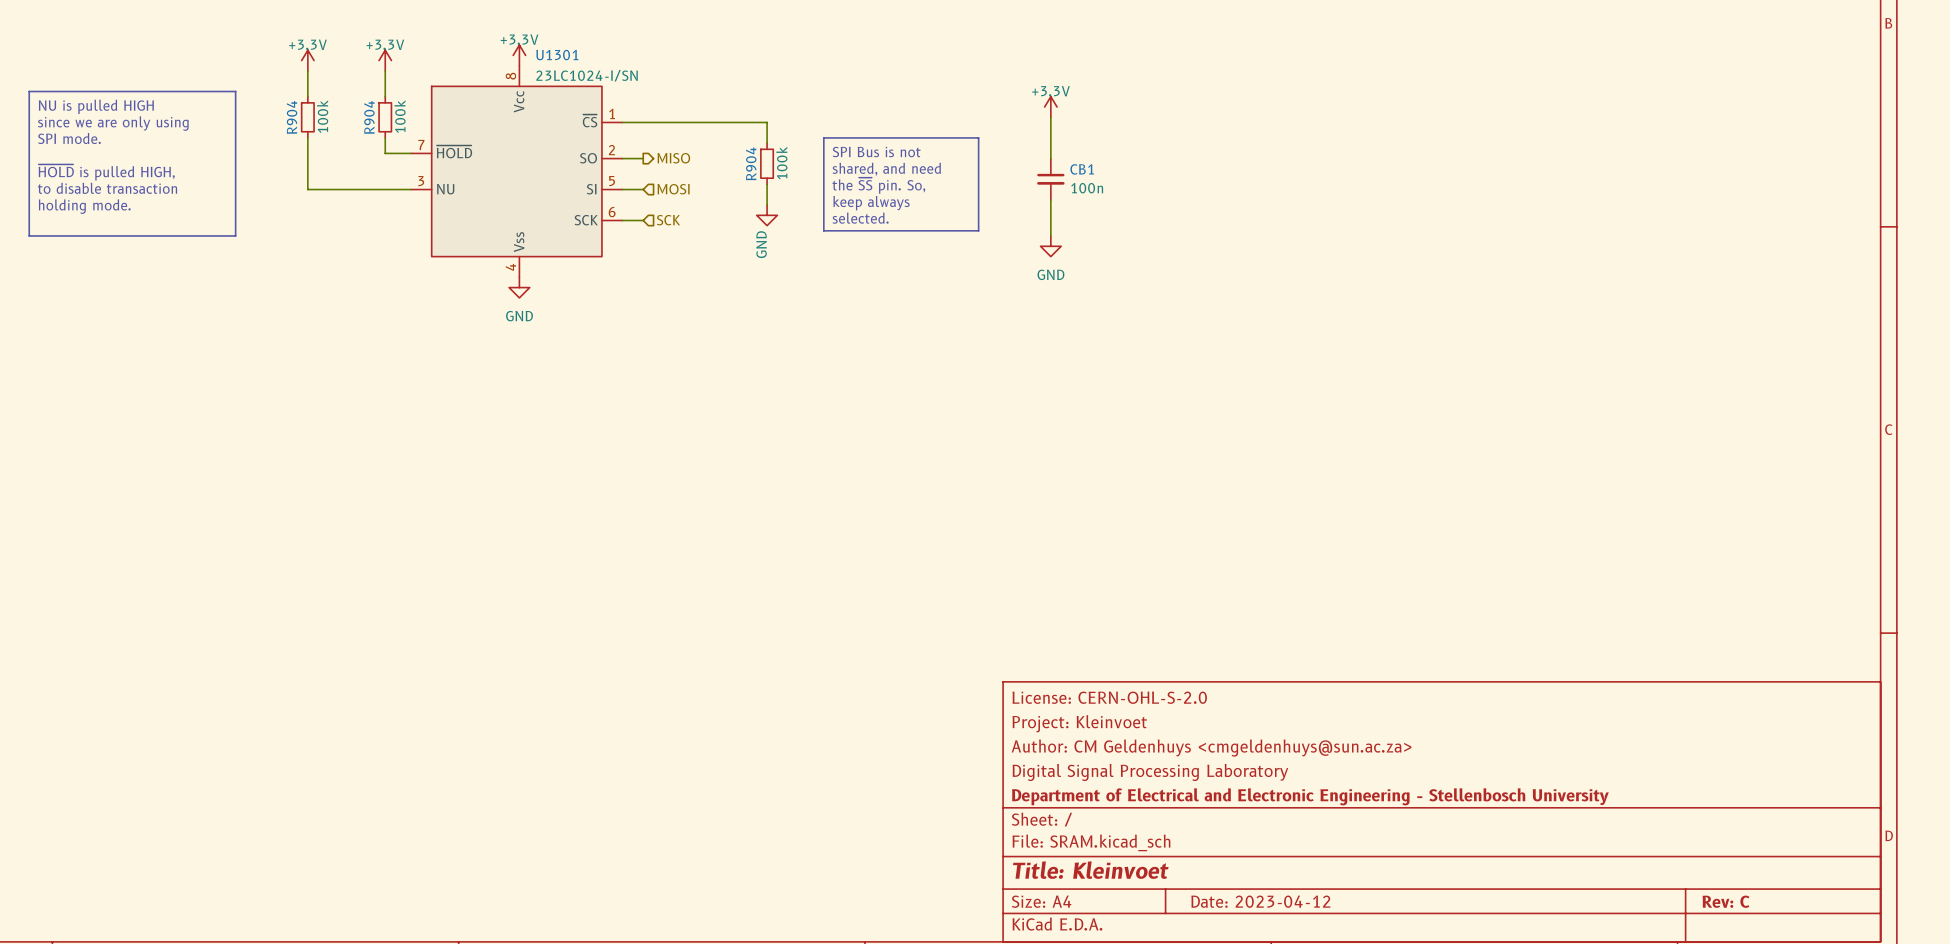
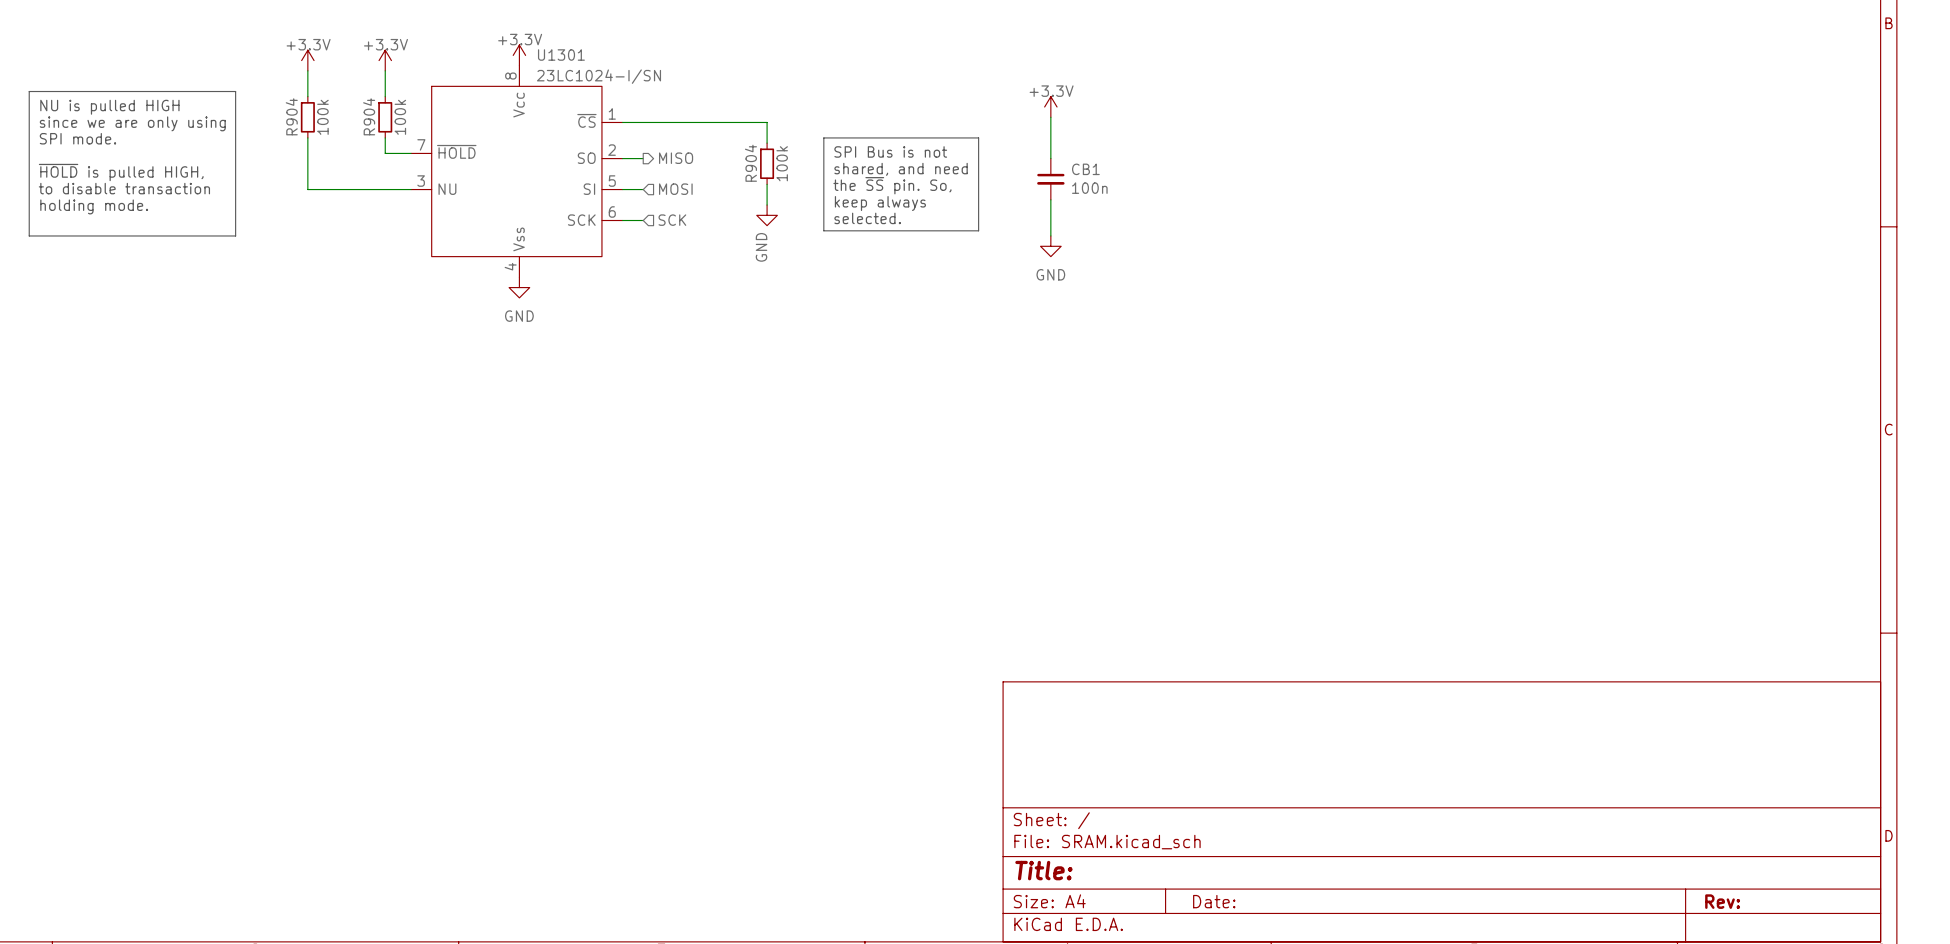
title block: License: CERN-OHL-S-2.0 (1109, 697) -> none
title block: Project: Kleinvoet (1079, 723) -> none
title block: Author: CM Geldenhuys <cmgeldenhuys@sun.ac.za> (1211, 748) -> none
title block: Digital Signal Processing Laboratory (1150, 772) -> none
title block: Department of Electrical and Electronic Engineering - Stellenbosch University (1310, 796) -> none
title block: Title: Kleinvoet (1090, 870) -> Title: (1043, 870)
title block: Date: 2023-04-12 (1260, 901) -> Date: (1214, 901)
title block: Rev: C (1725, 901) -> Rev: (1722, 901)

